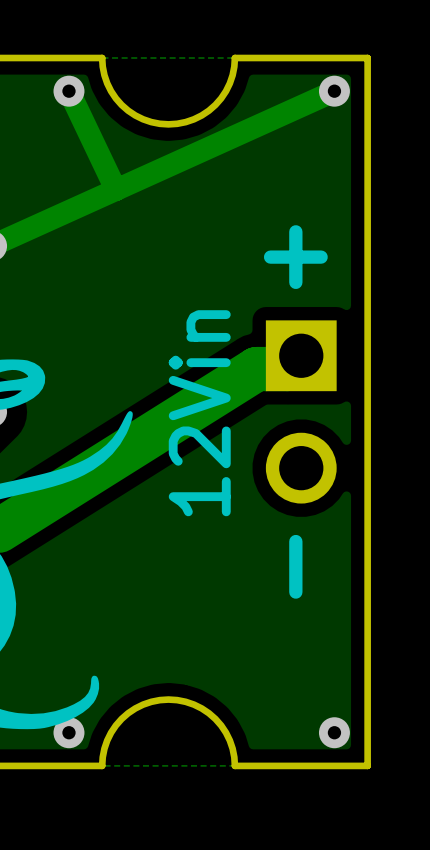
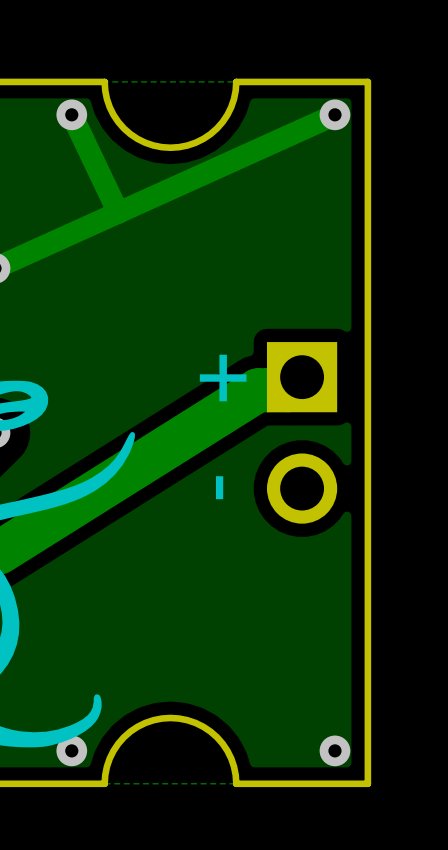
part text position: + (295, 257) -> + (223, 378)
text: 12Vin (199, 413) -> none
part text position: - (295, 566) -> - (219, 487)

